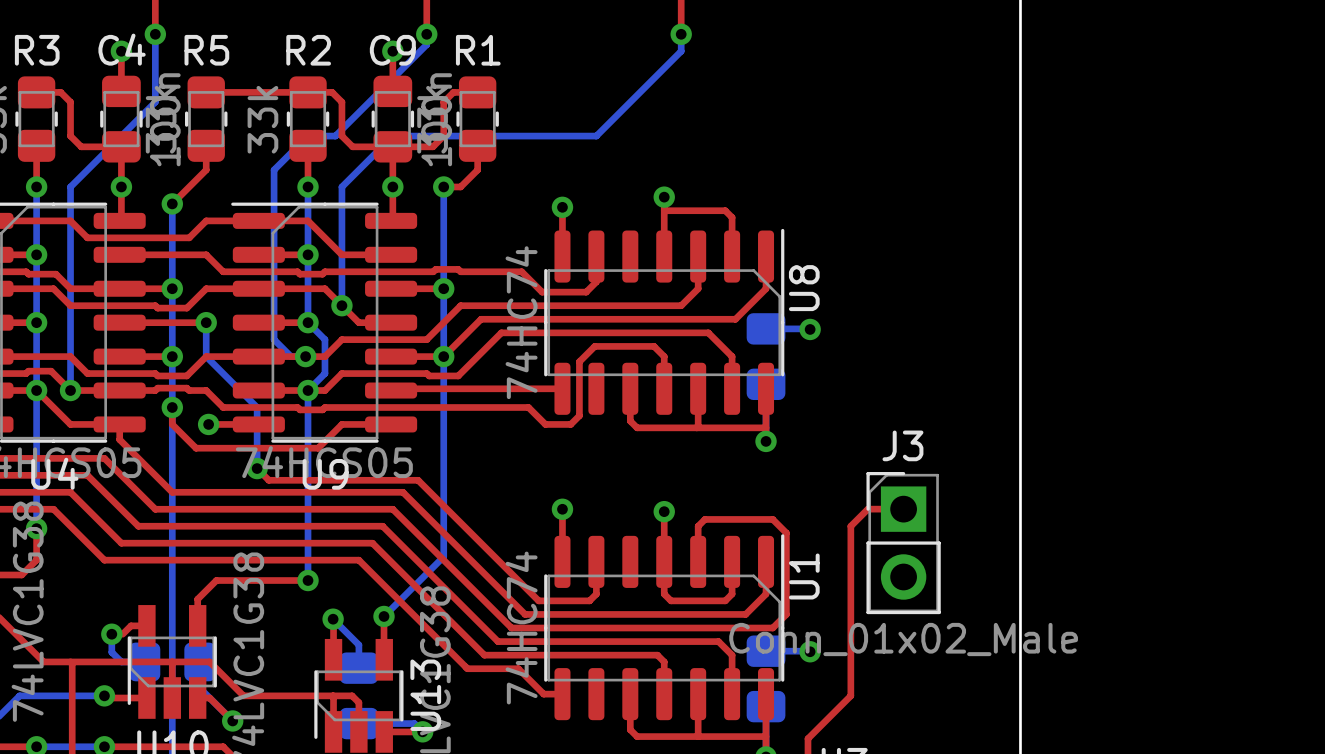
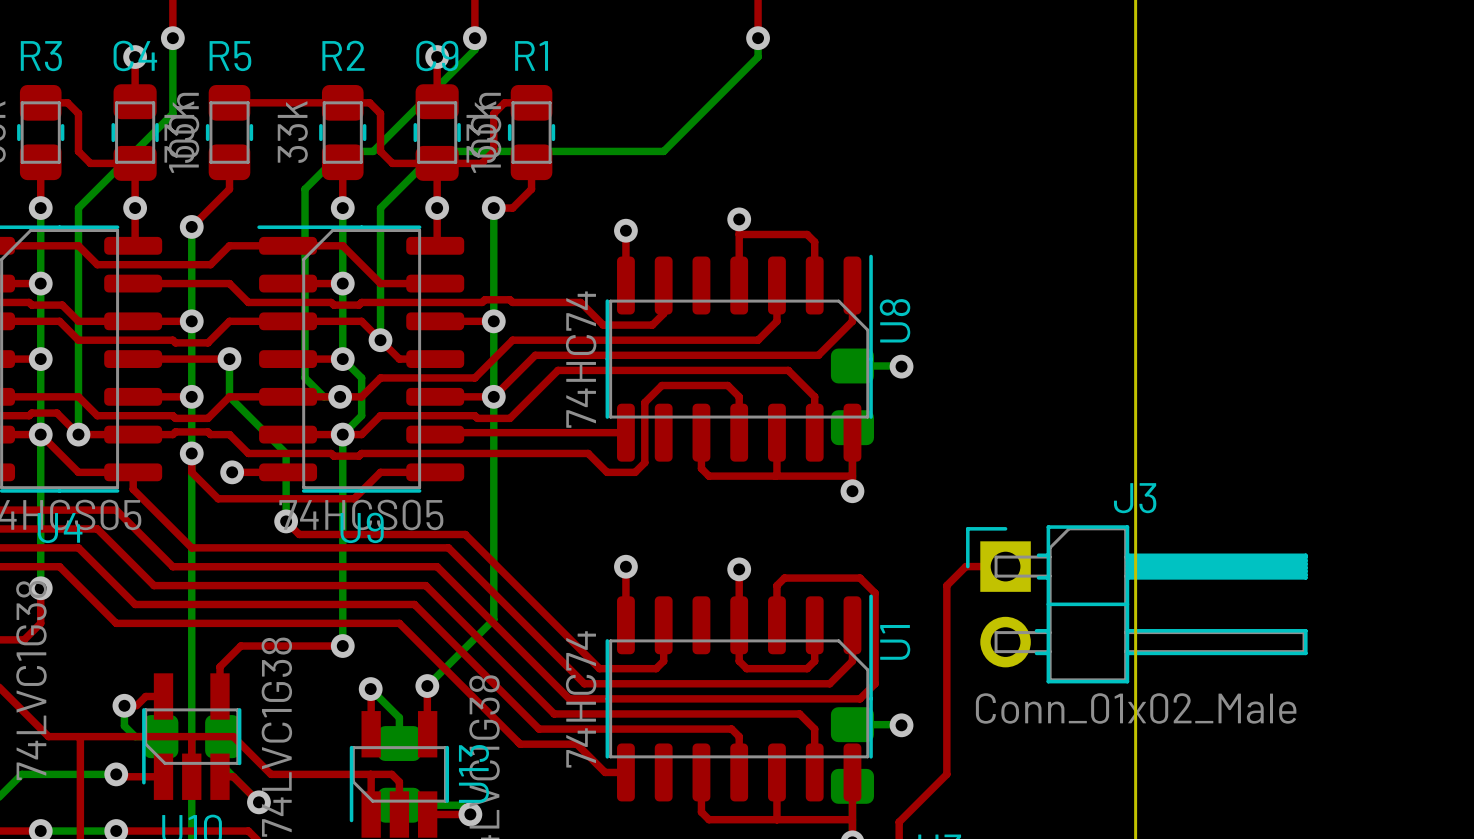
J3 footprint: [866, 472, 941, 615] -> [966, 525, 1308, 684]

